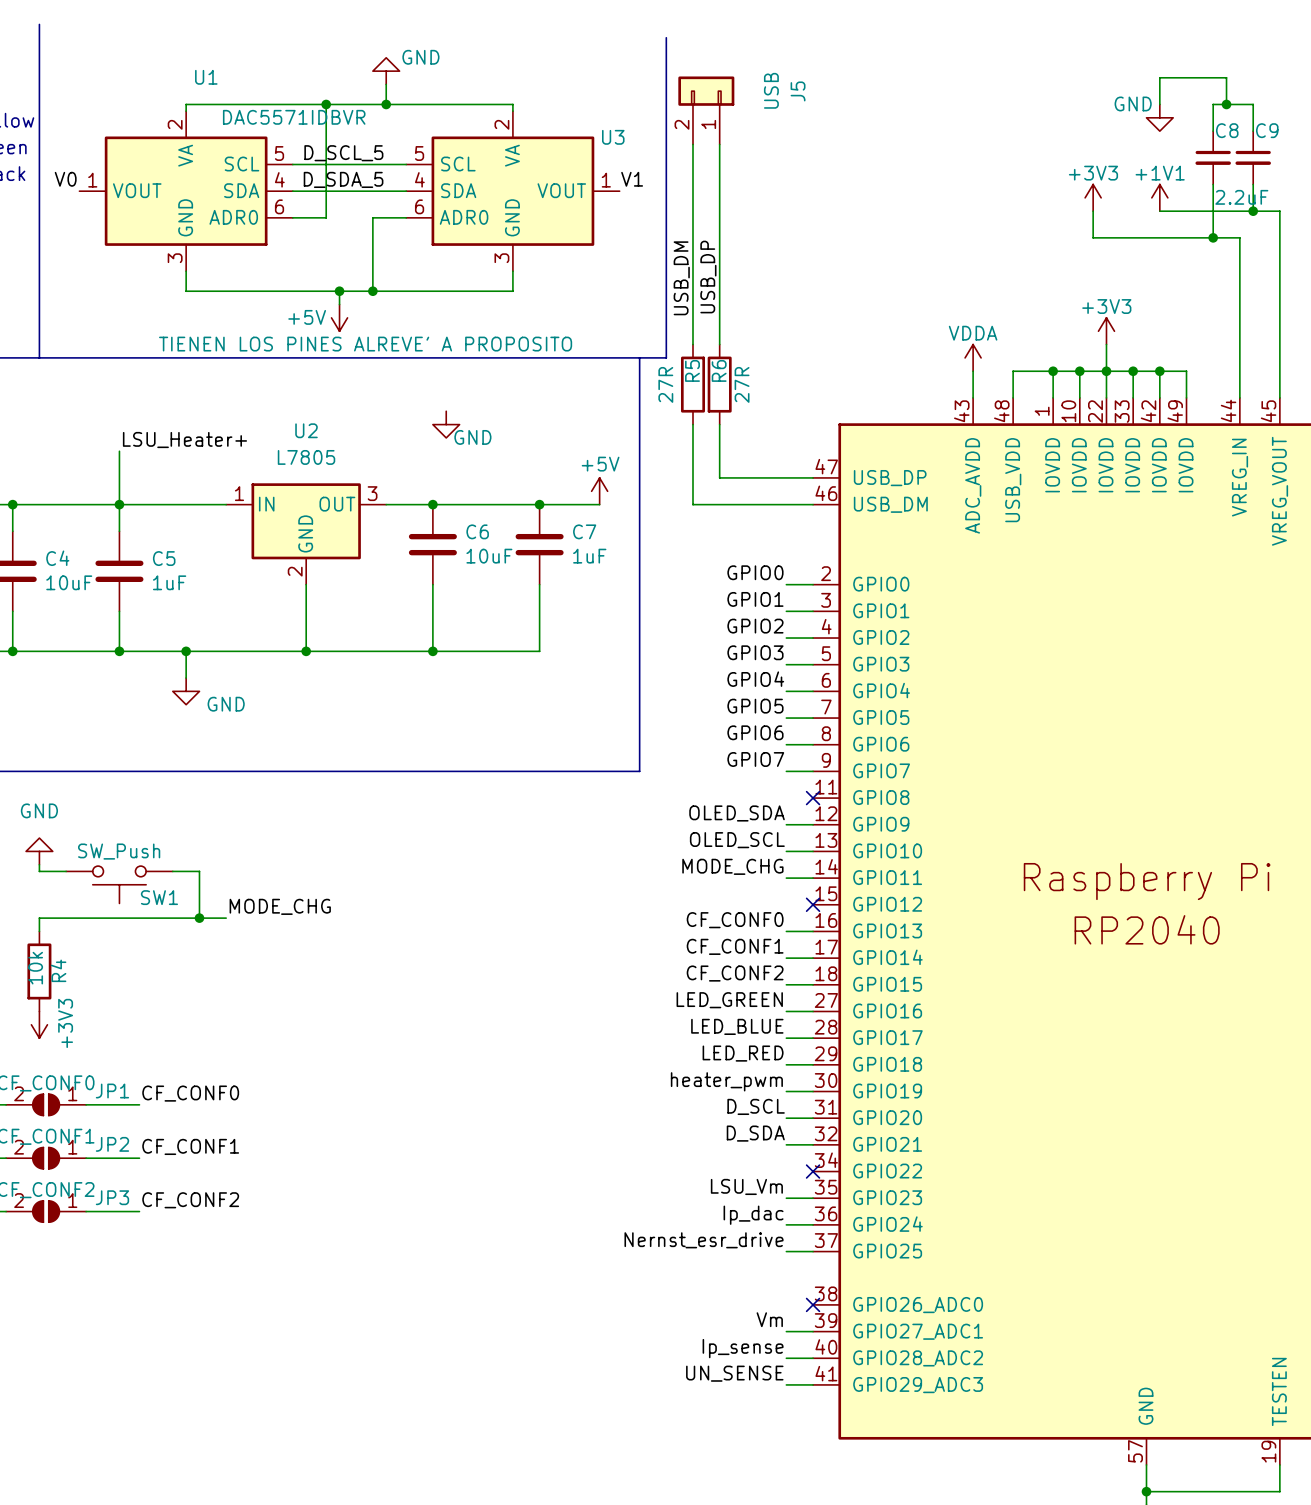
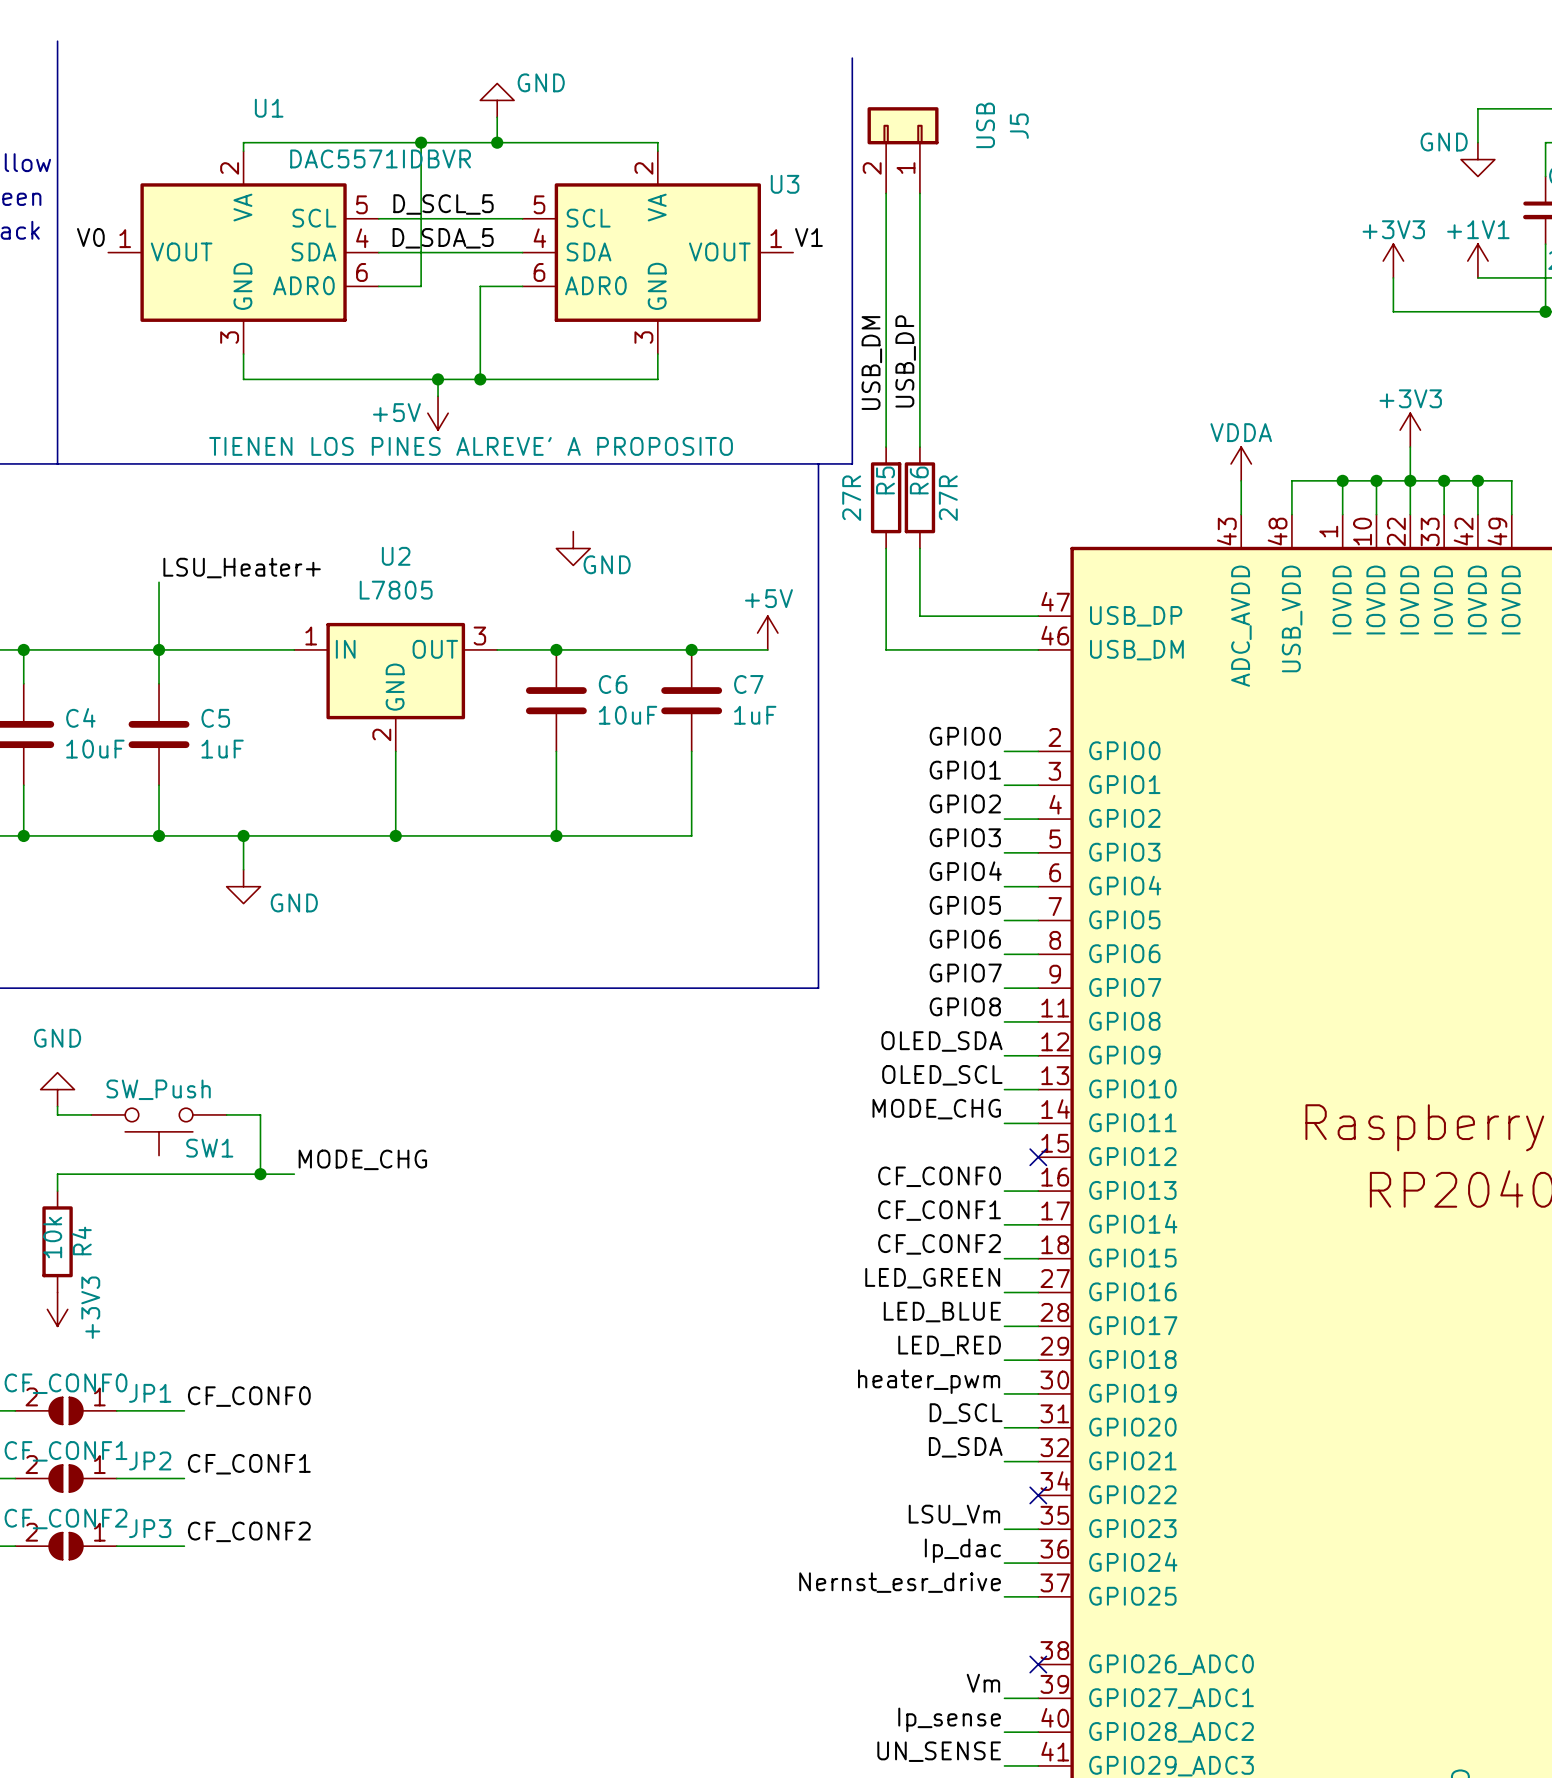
label: none -> GPIO8 (965, 1006)
wire: none -> (1004, 1021) (1038, 1021)
no-connect mark: (813, 798) -> none

